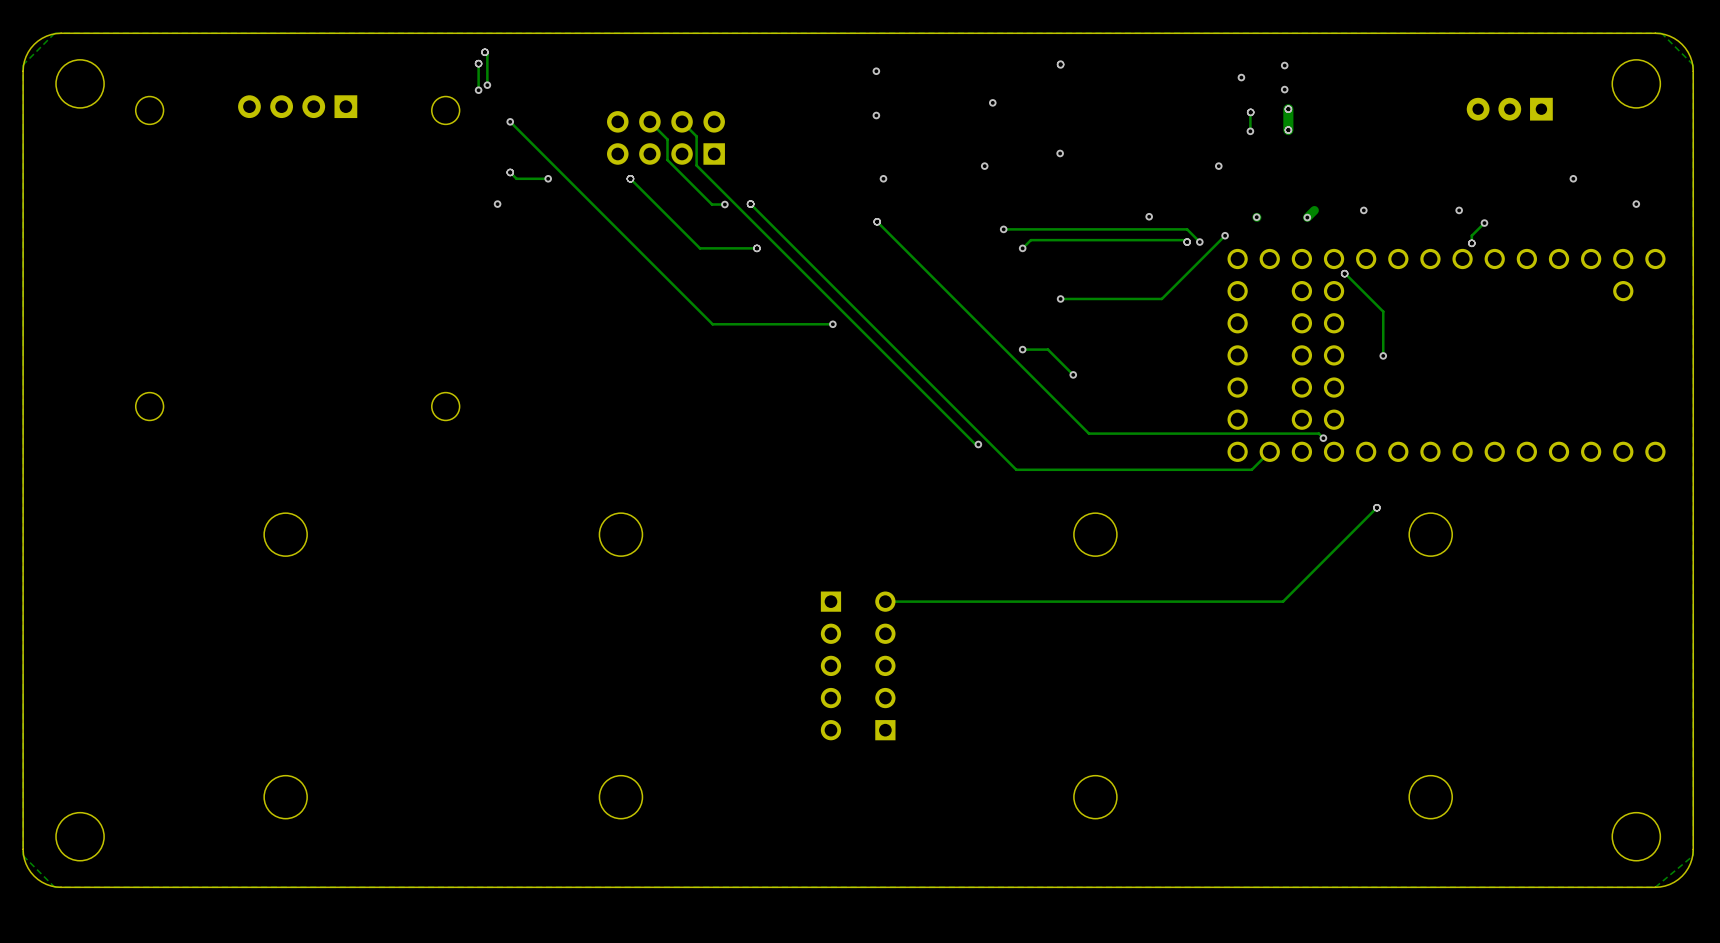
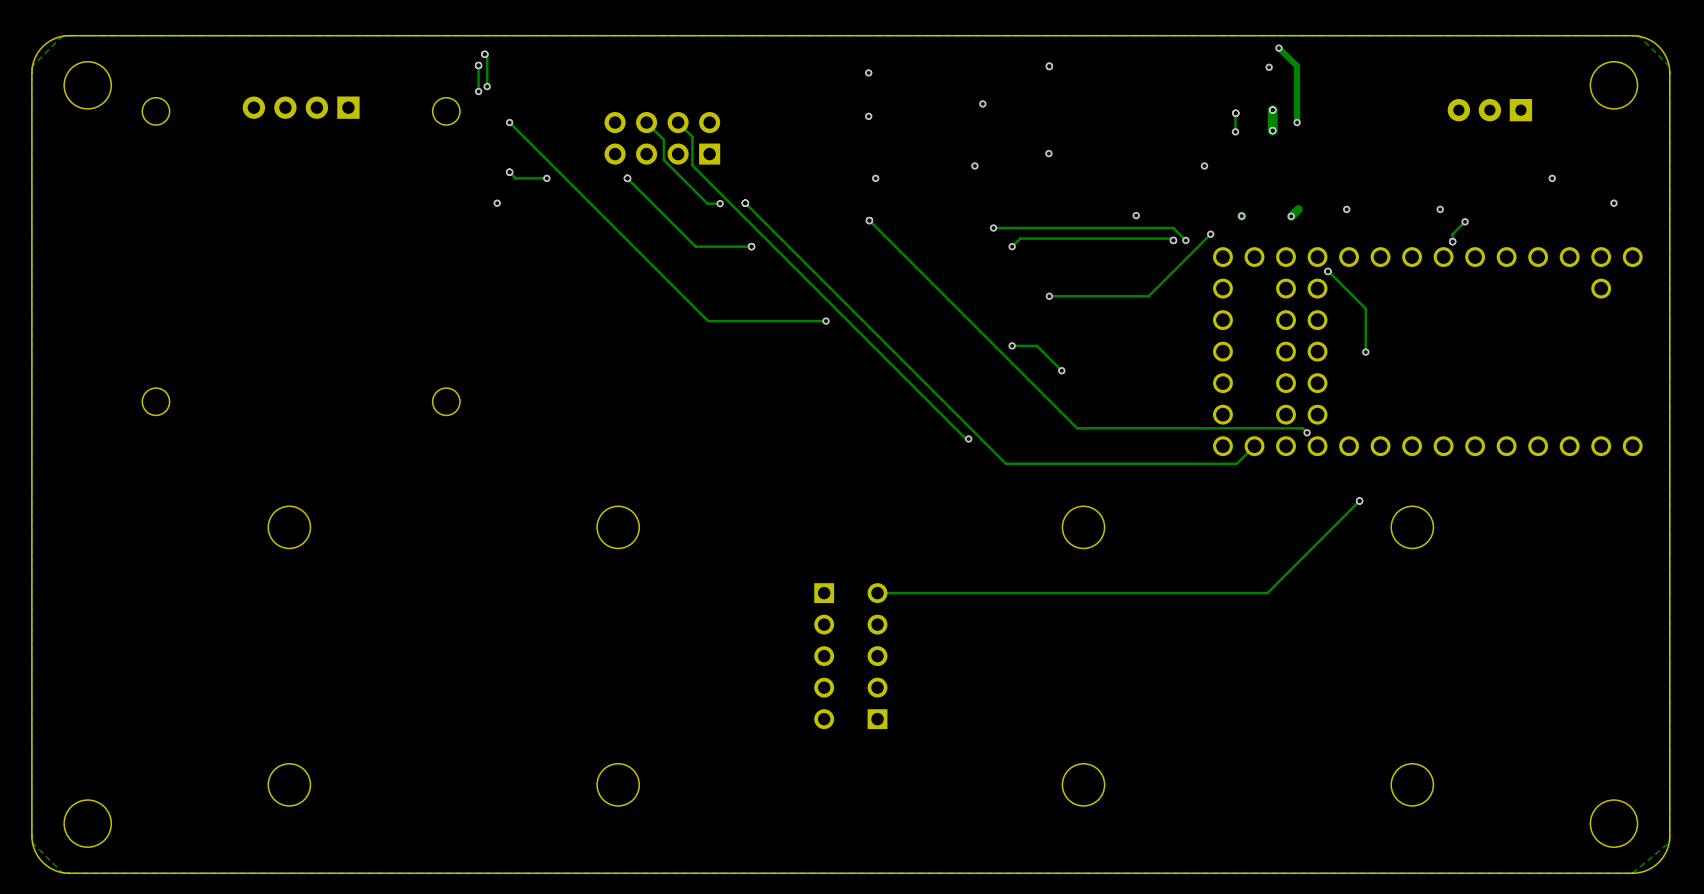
track: none -> (1278, 48) (1297, 66) (1297, 122)
via: none -> (1278, 48)
via: (1241, 77) -> none
via: (1284, 89) -> none
via: none -> (1297, 122)

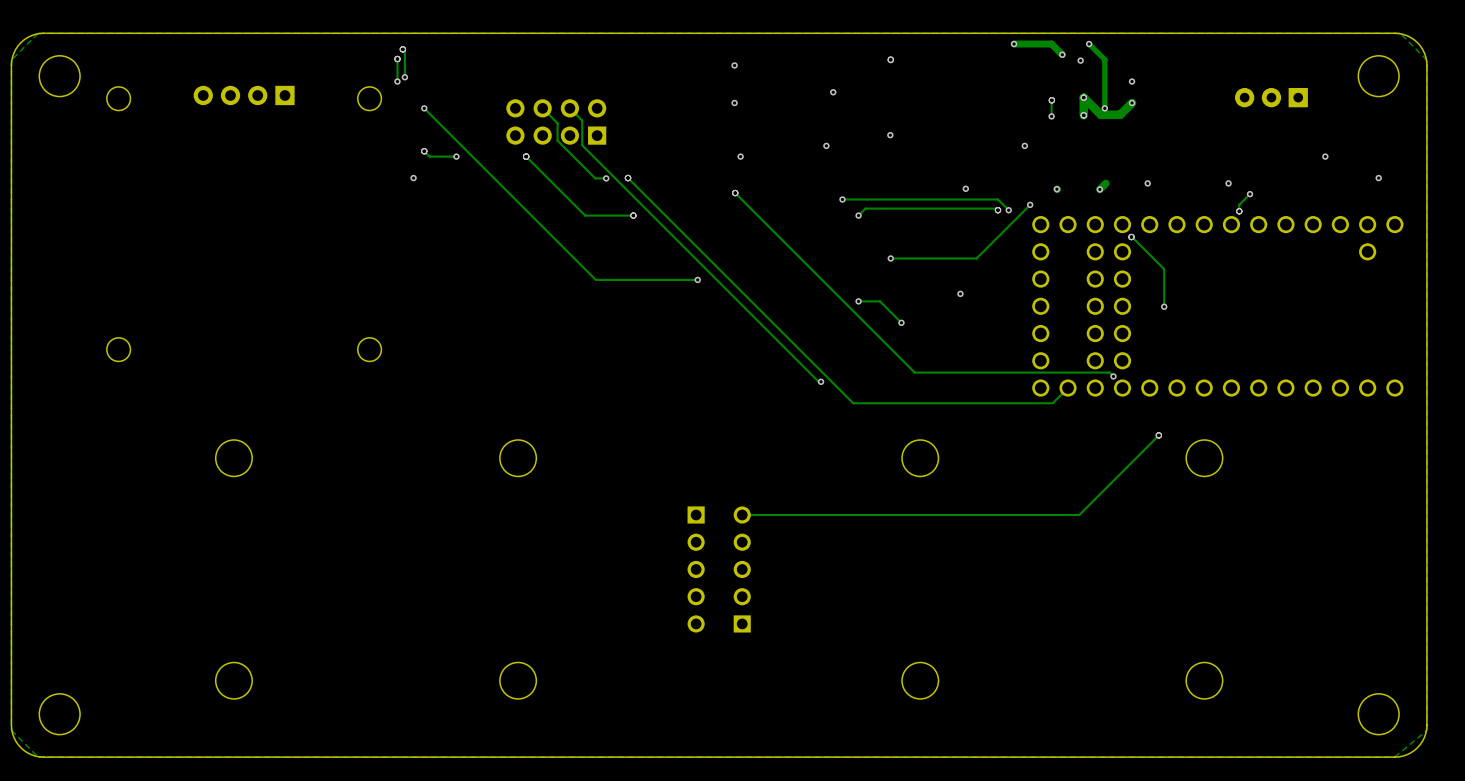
track: none -> (1014, 44) (1051, 44) (1062, 54)
via: none -> (1014, 44)
via: none -> (1062, 54)
via: none -> (1132, 81)
track: none -> (1083, 97) (1100, 114) (1120, 114) (1132, 102)
via: none -> (1132, 102)
via: none -> (960, 293)

